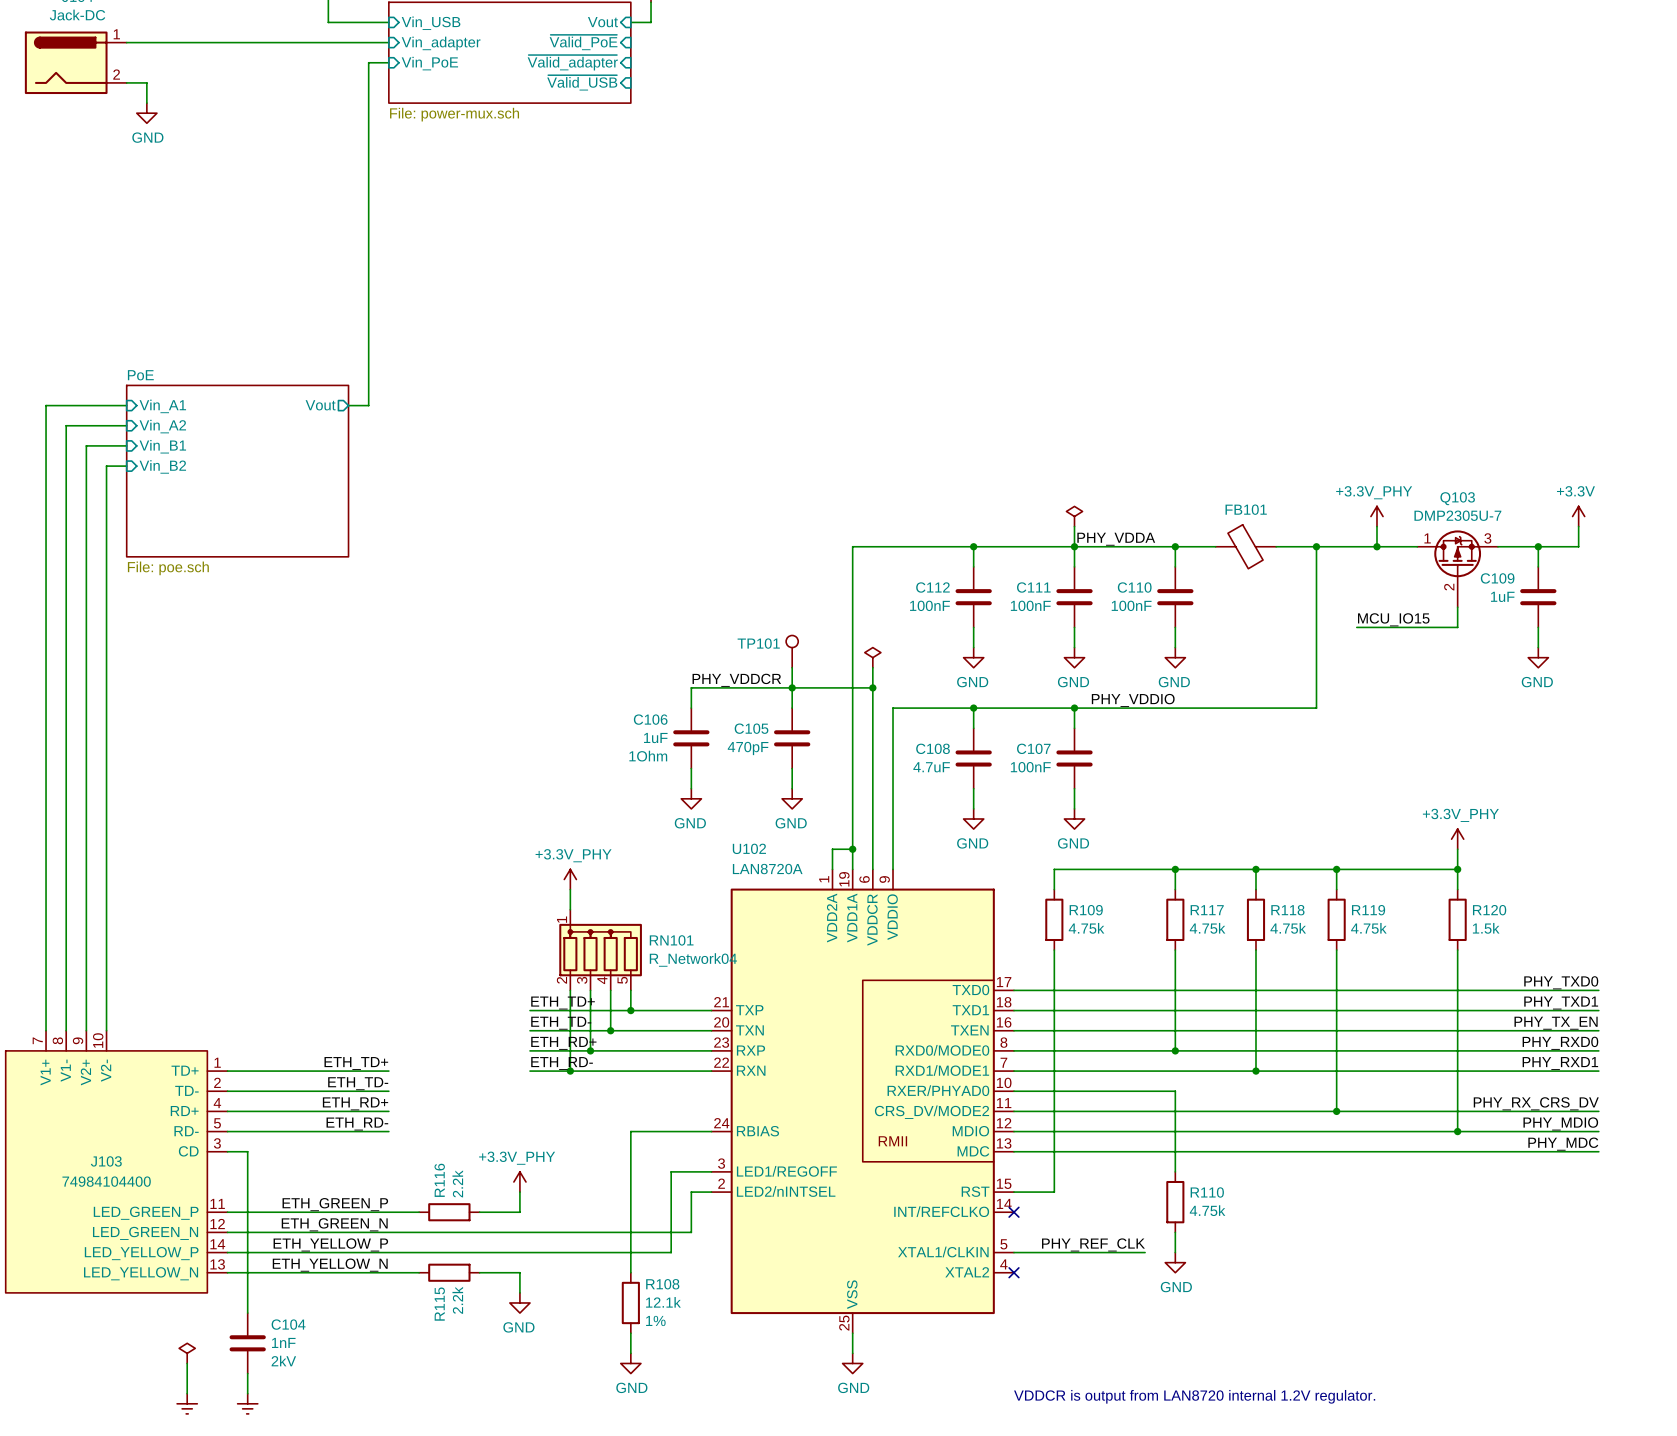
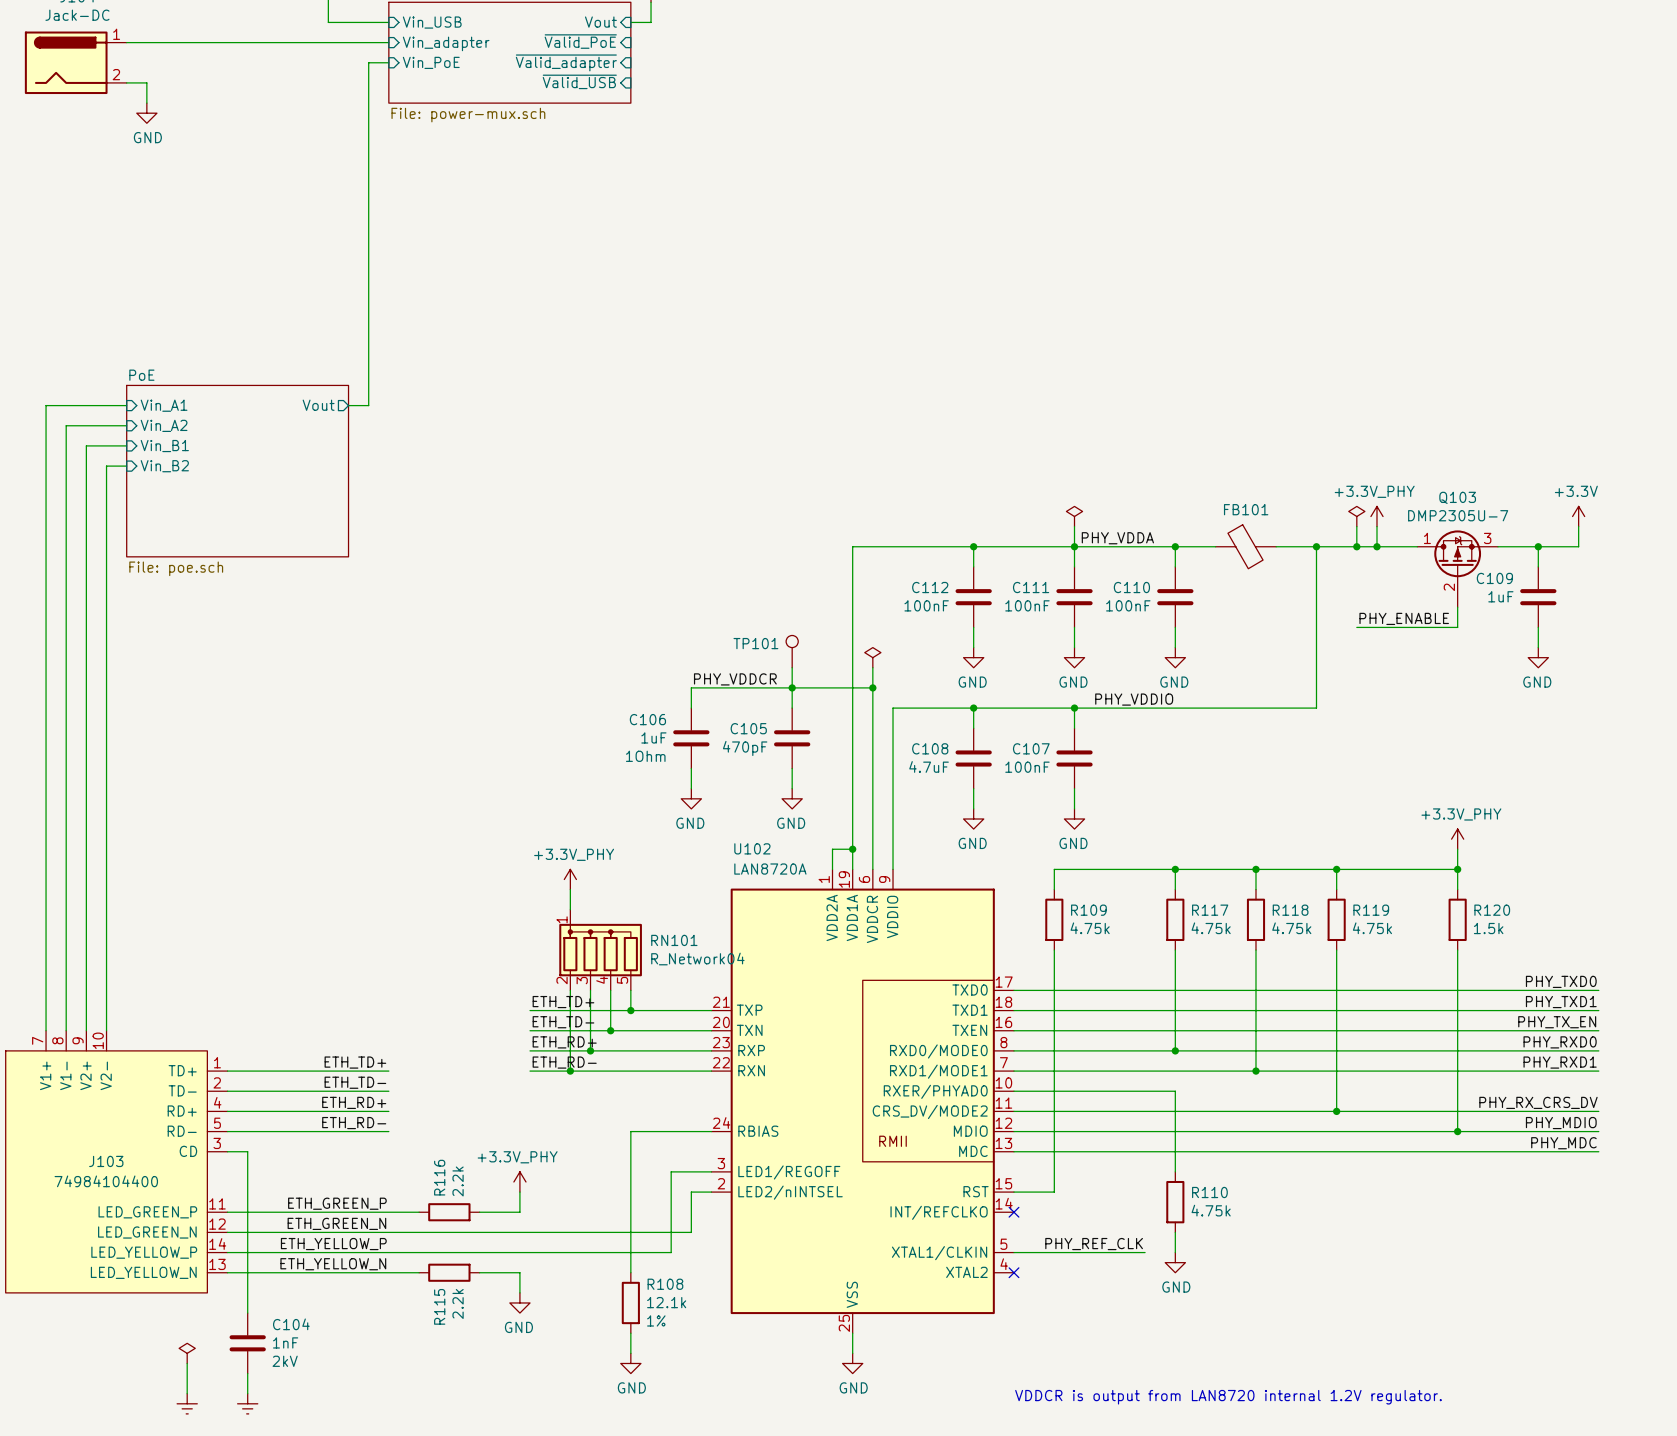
power symbol: none -> (1356, 516)
wire: none -> (1356, 526) (1356, 546)
junction: none -> (1356, 546)
label: MCU_IO15 (1393, 619) -> PHY_ENABLE (1404, 618)

